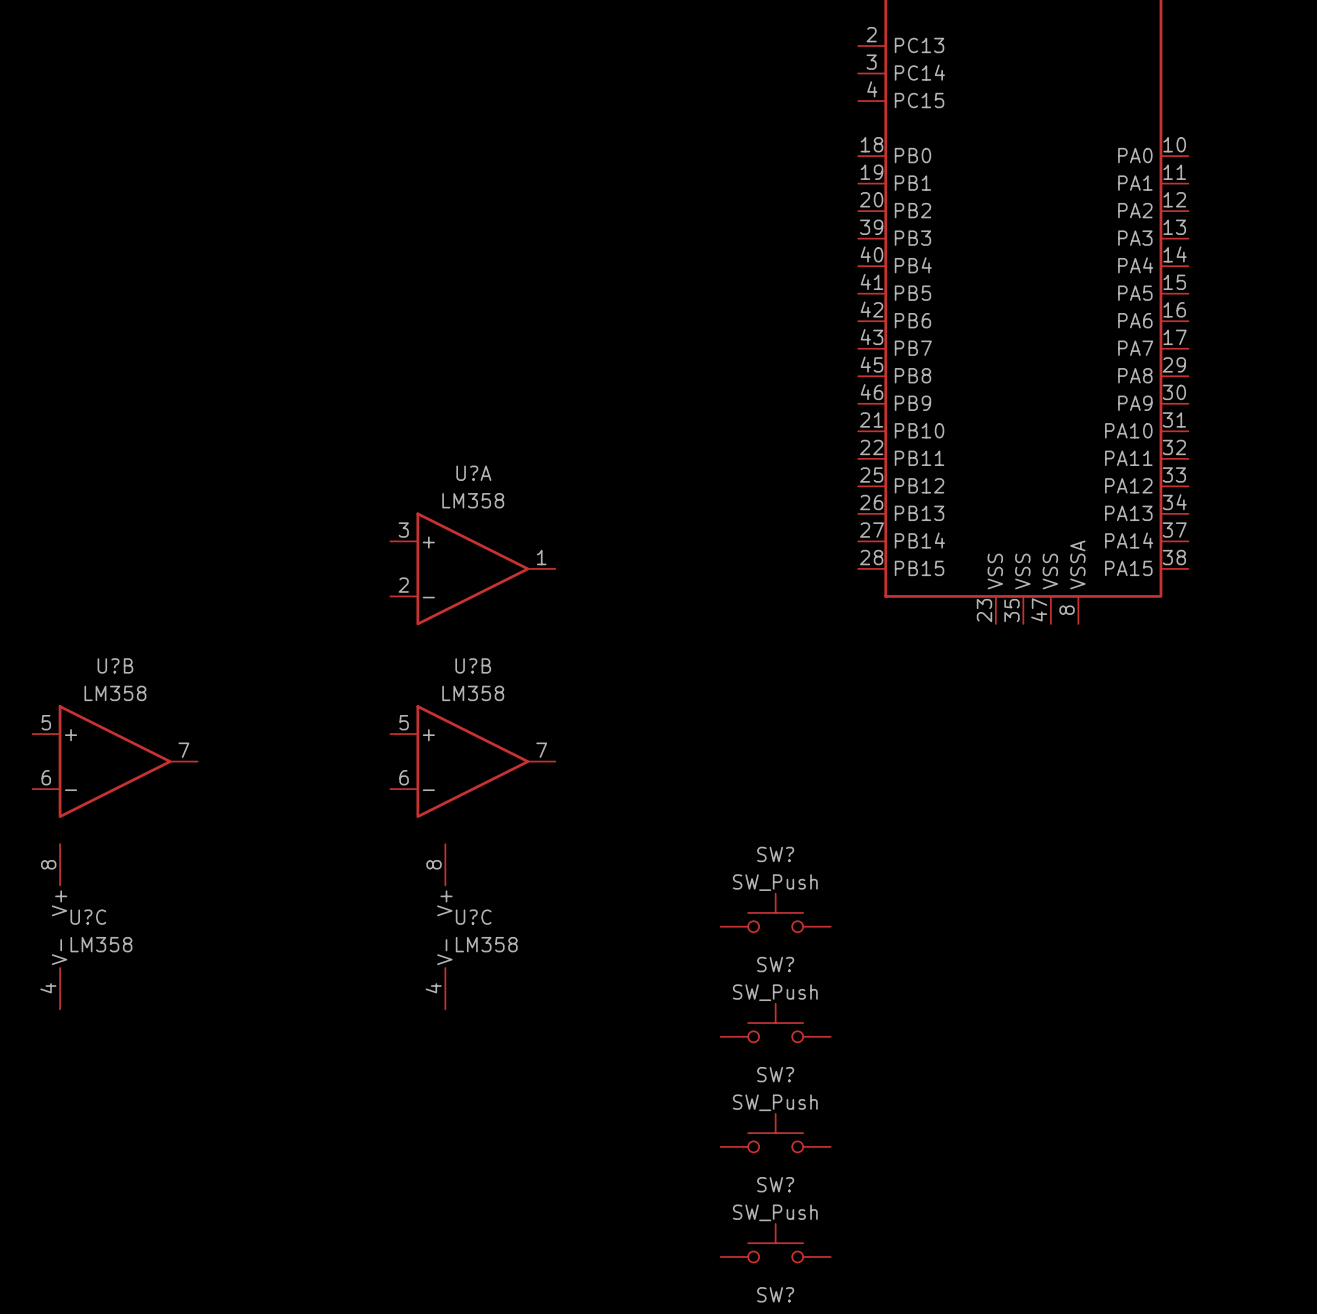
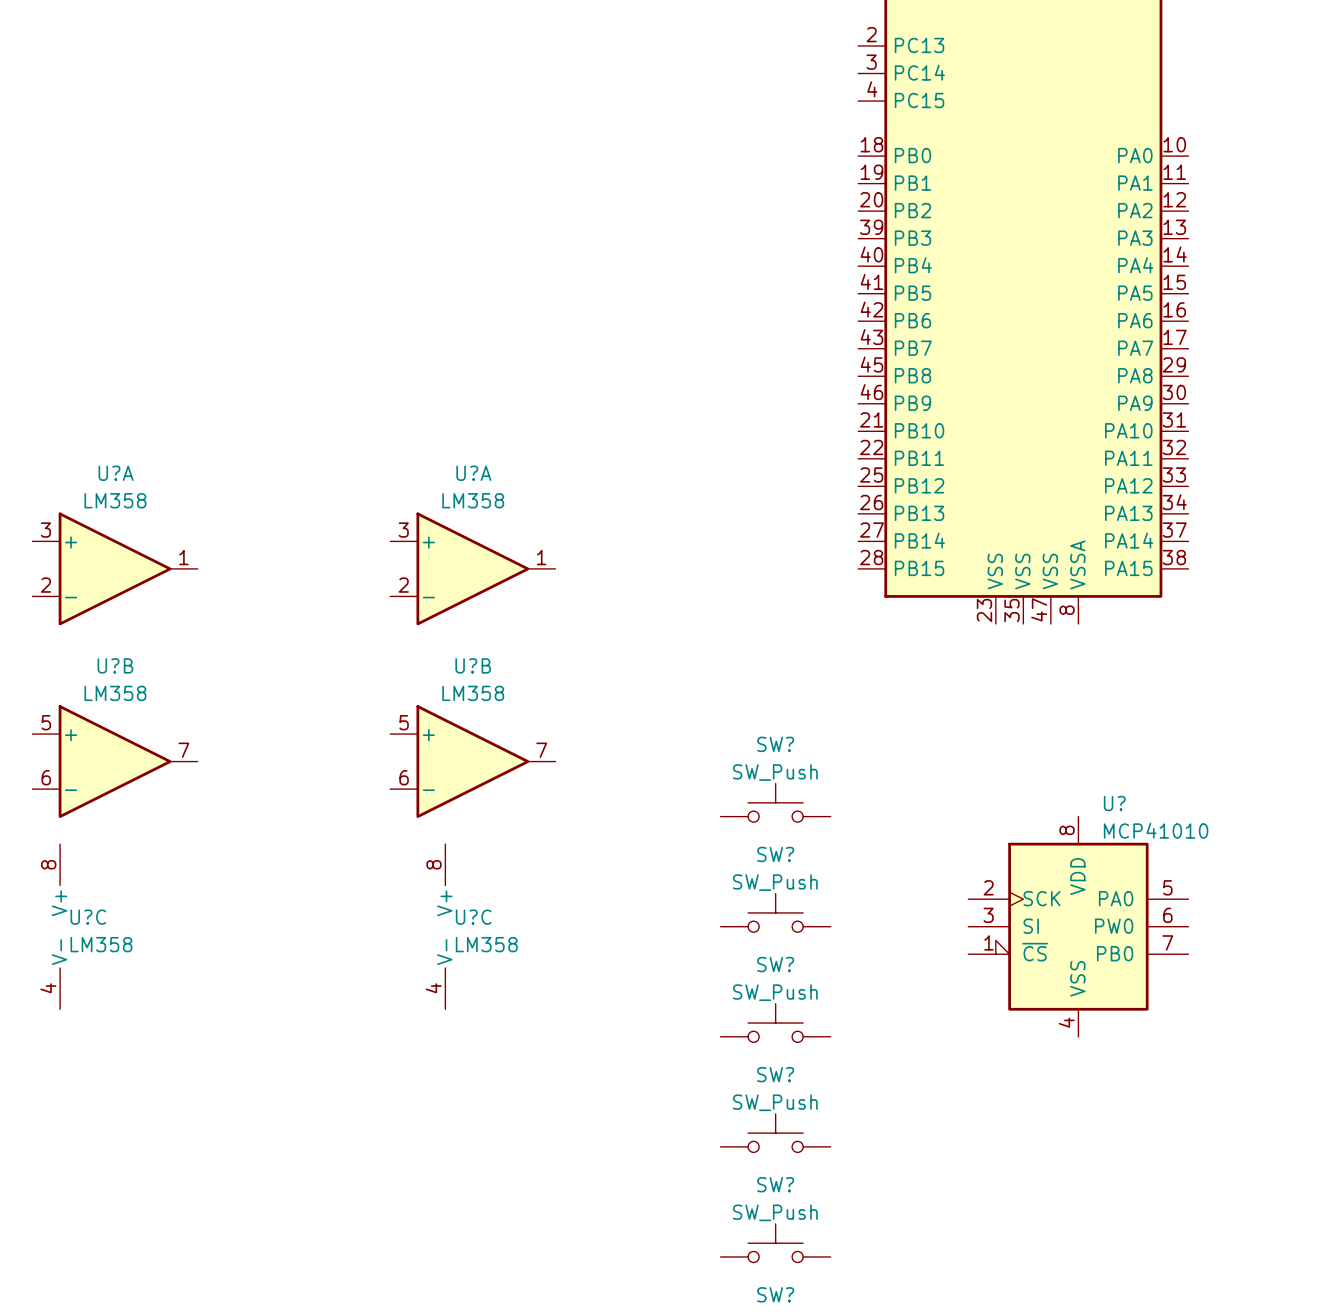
U?A: none -> LM358 (115, 568)
SW?: none -> SW_Push (775, 802)
U?: none -> MCP41010 (1078, 926)

